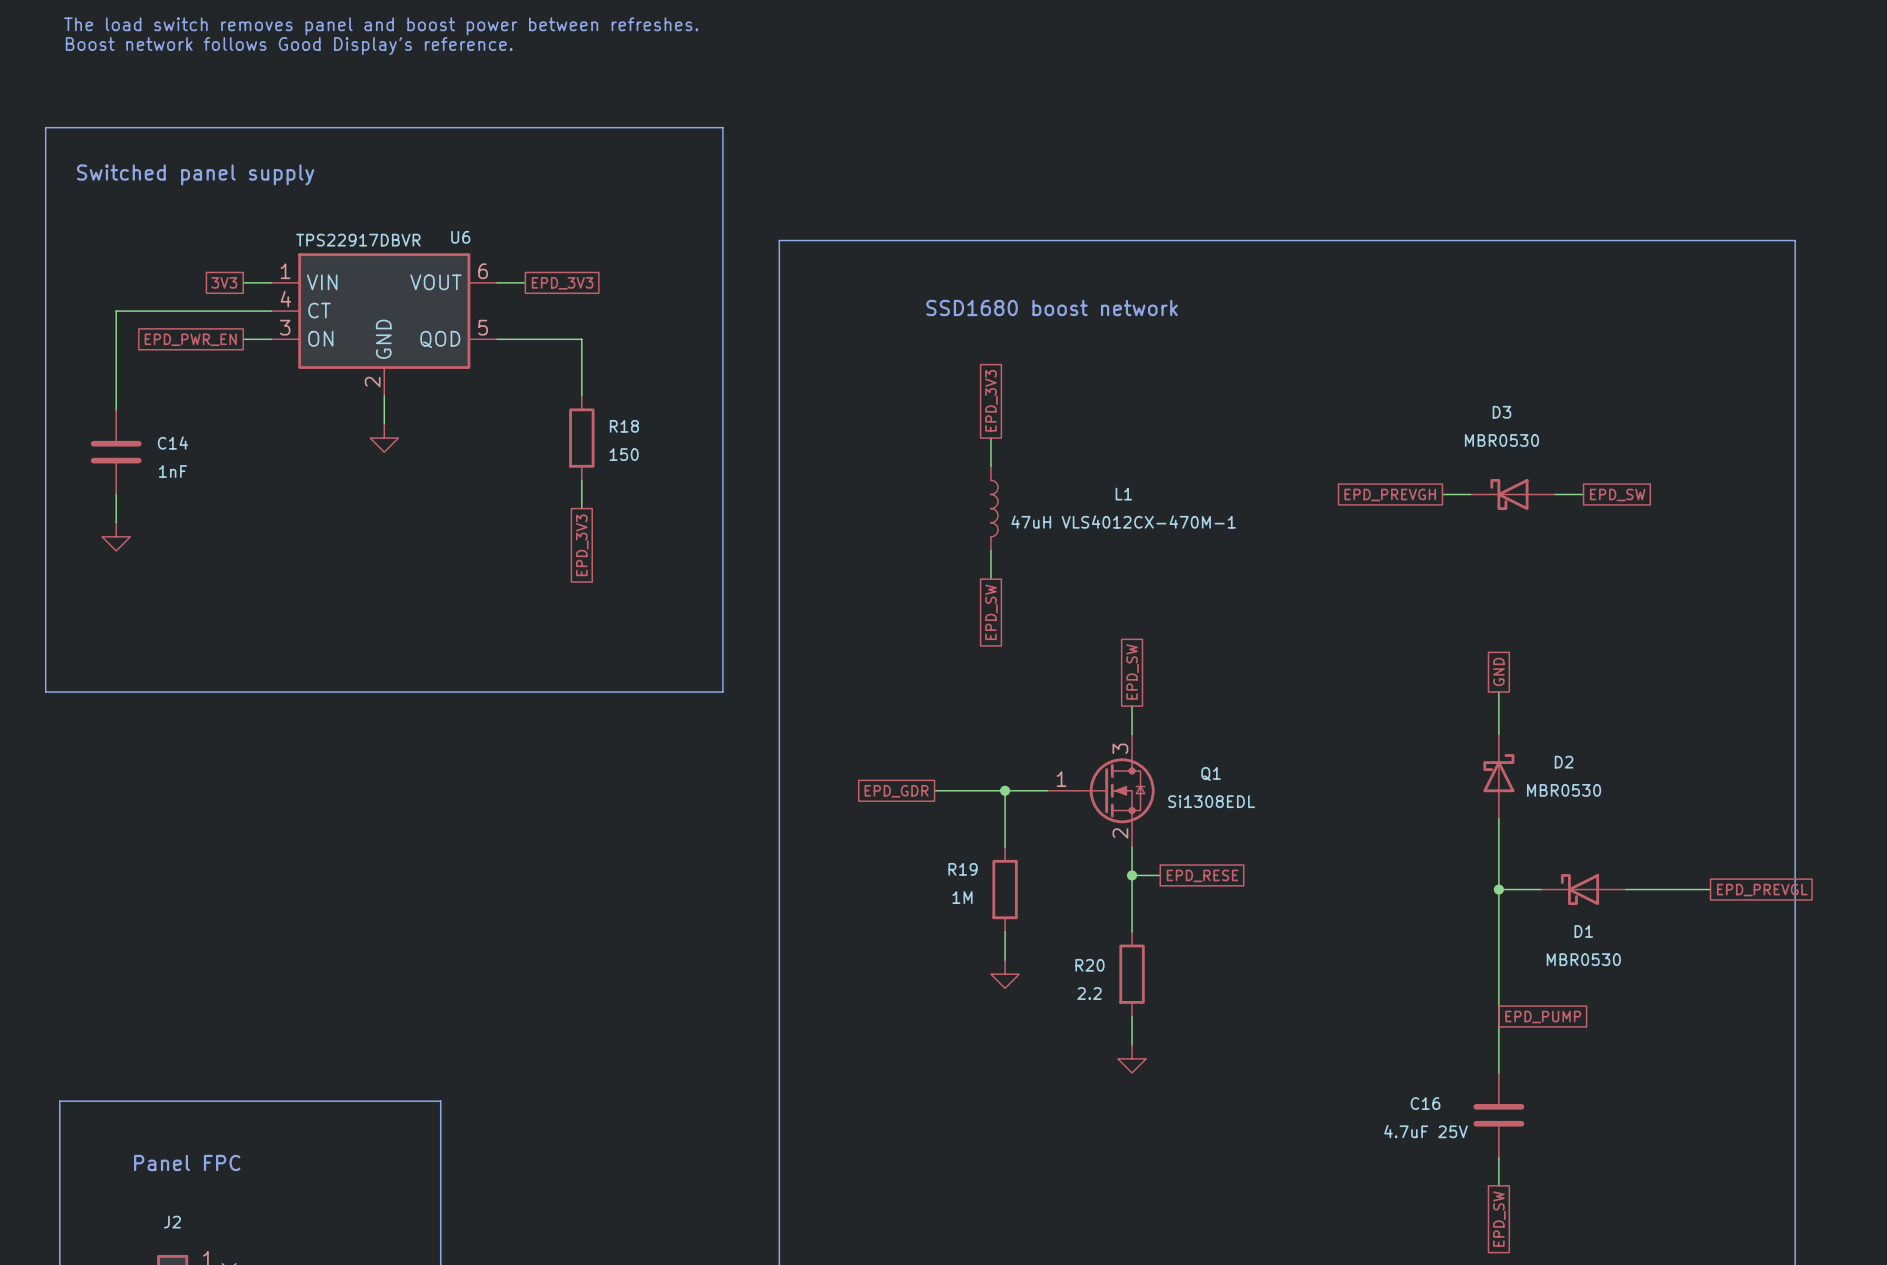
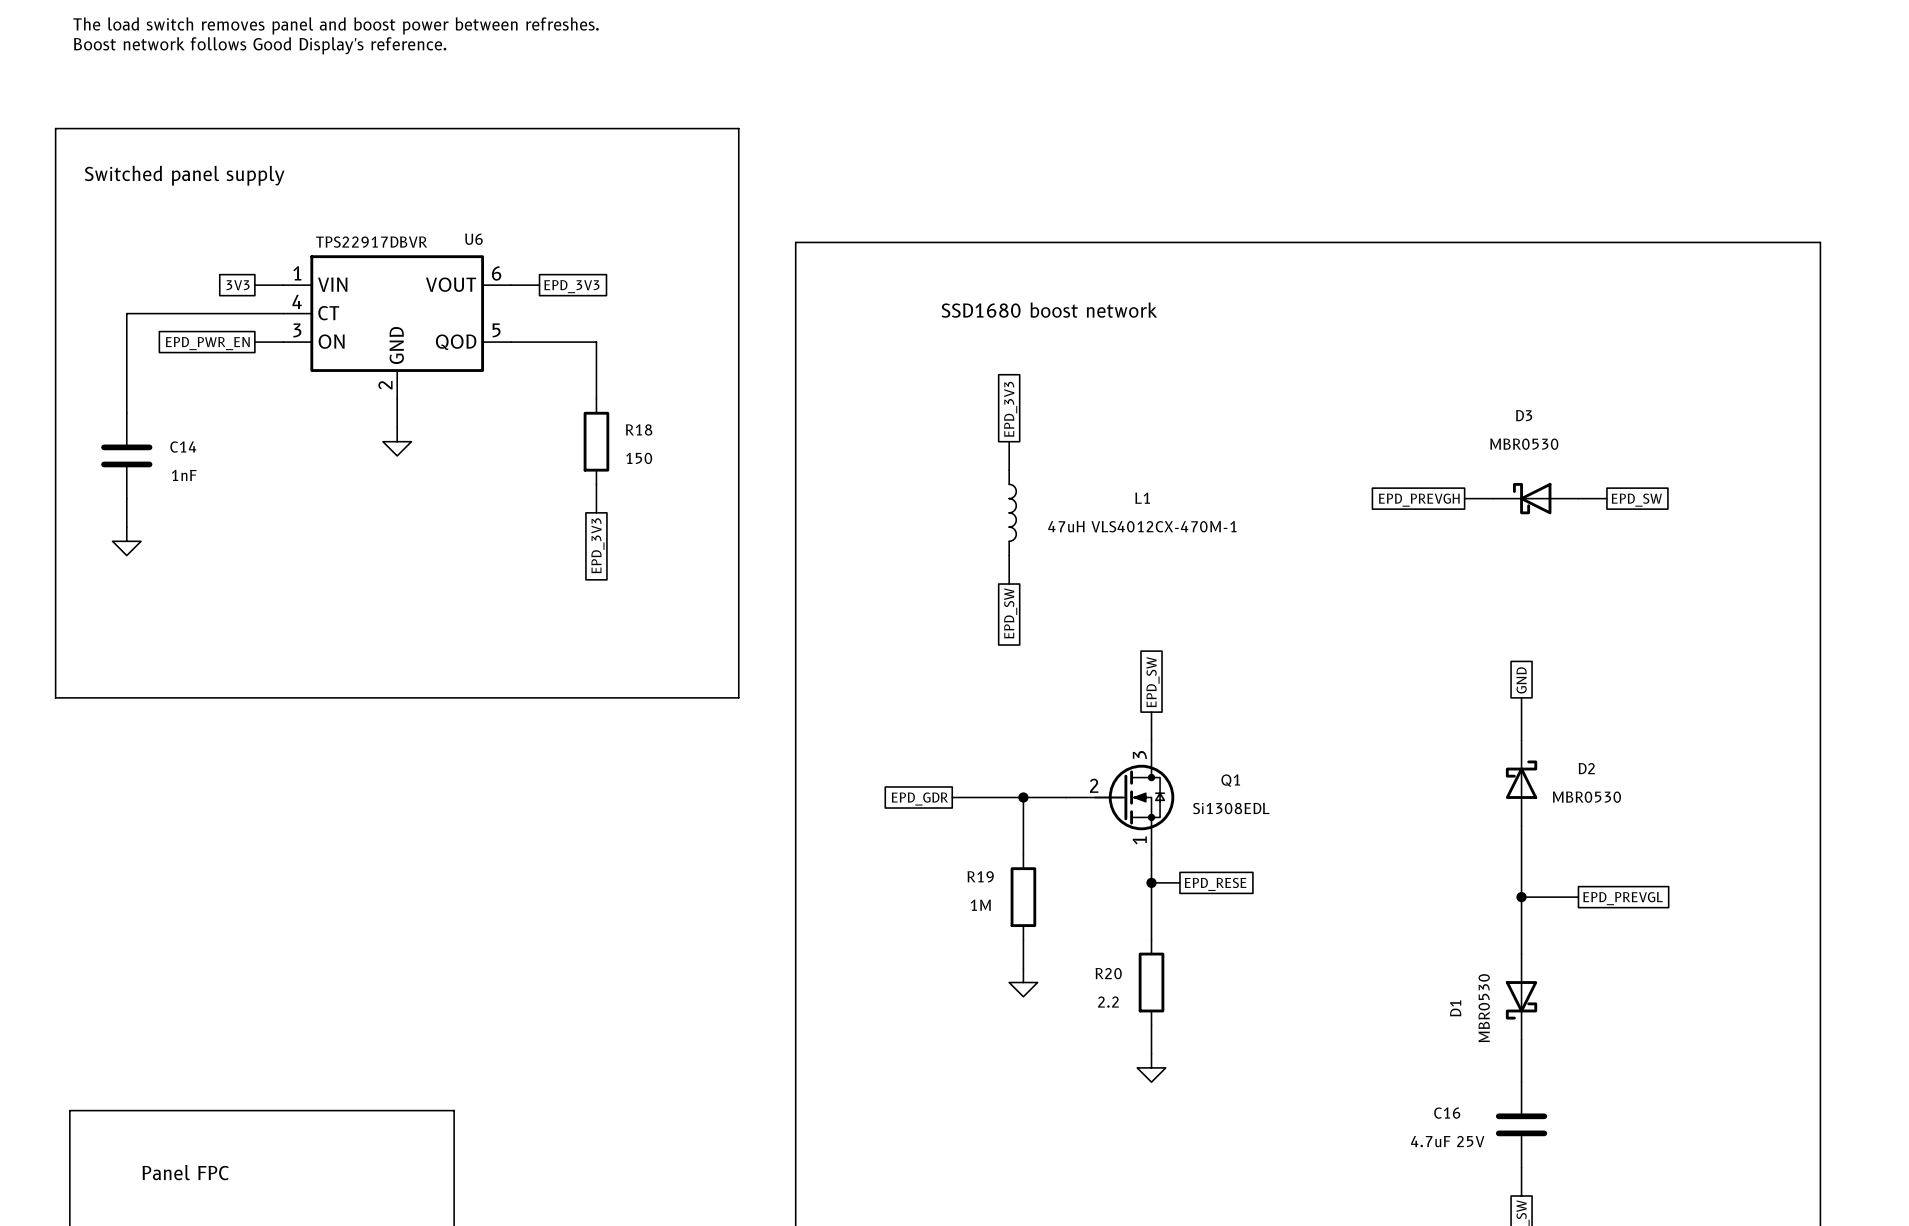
Q1 symbol: [1047, 734, 1155, 848] -> [1066, 740, 1175, 855]
D1 rotation: 0° (1580, 889) -> 90° counterclockwise (1521, 1000)
D1 position: (1583, 889) -> (1521, 996)
wire: (1625, 889) (1710, 889) -> none
global label position: EPD_PREVGL (1762, 890) -> EPD_PREVGL (1623, 898)
D1 name position: D1 (1583, 931) -> D1 (1455, 1008)
D1 value position: MBR0530 (1583, 959) -> MBR0530 (1484, 1008)
global label: EPD_PUMP (1543, 1017) -> none

